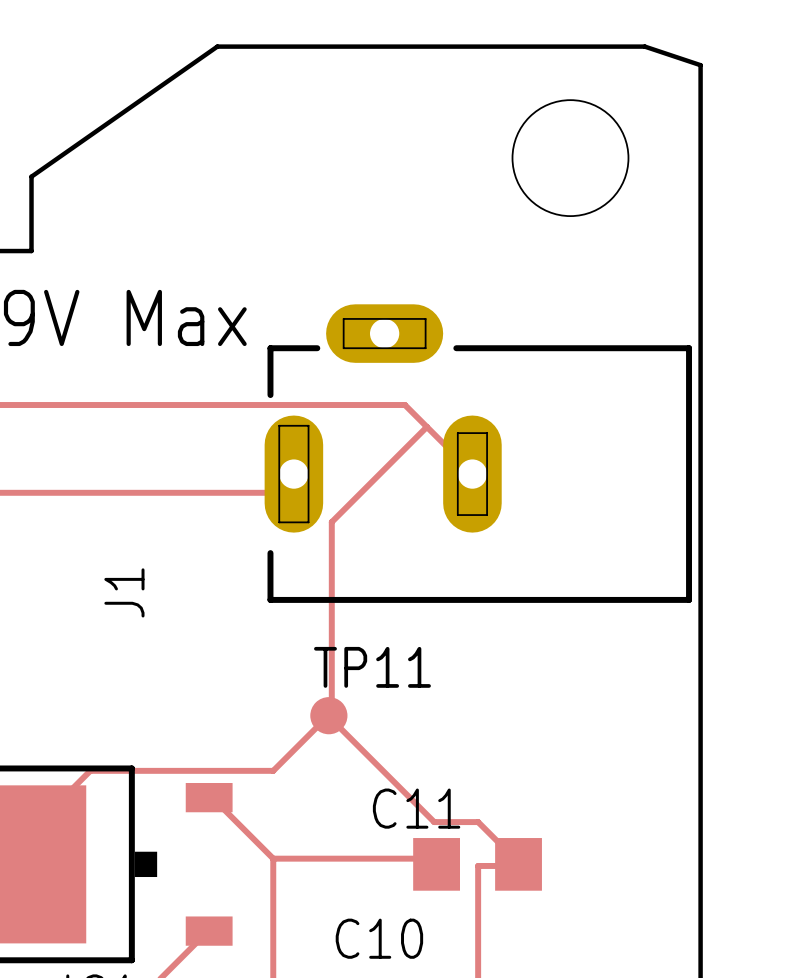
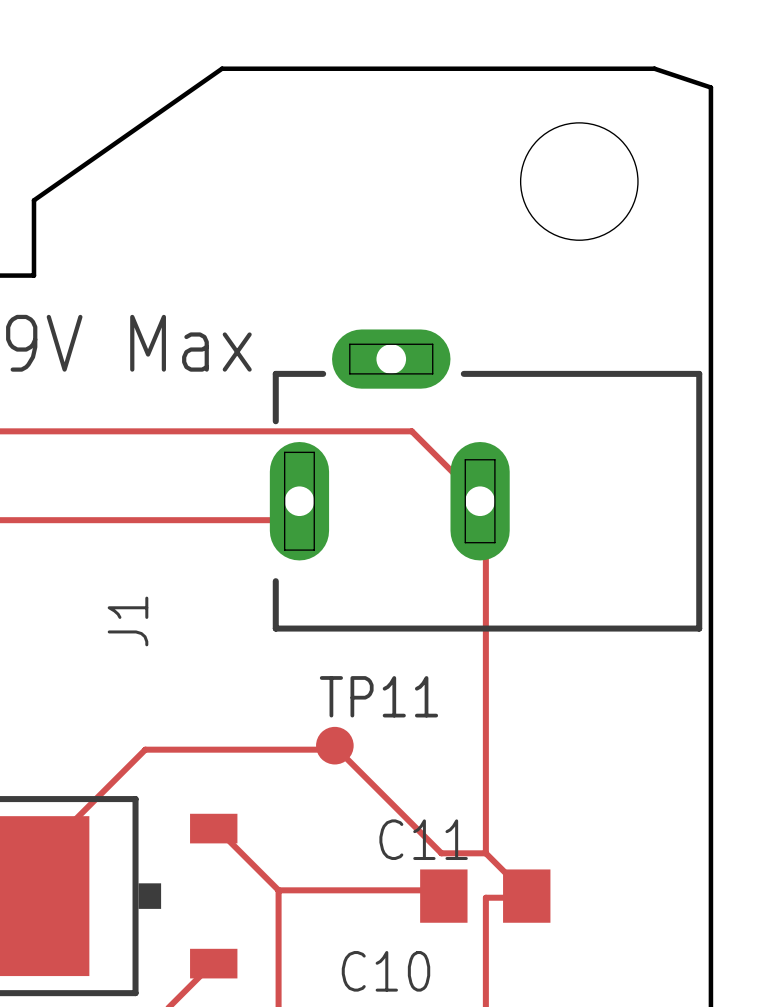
top track: (426, 426) (331, 522) (331, 712) (328, 715) -> none
top track: none -> (480, 501) (485, 505) (485, 853)
top track: (324, 719) (273, 770) (90, 770) -> (330, 749) (145, 749) (93, 801)

